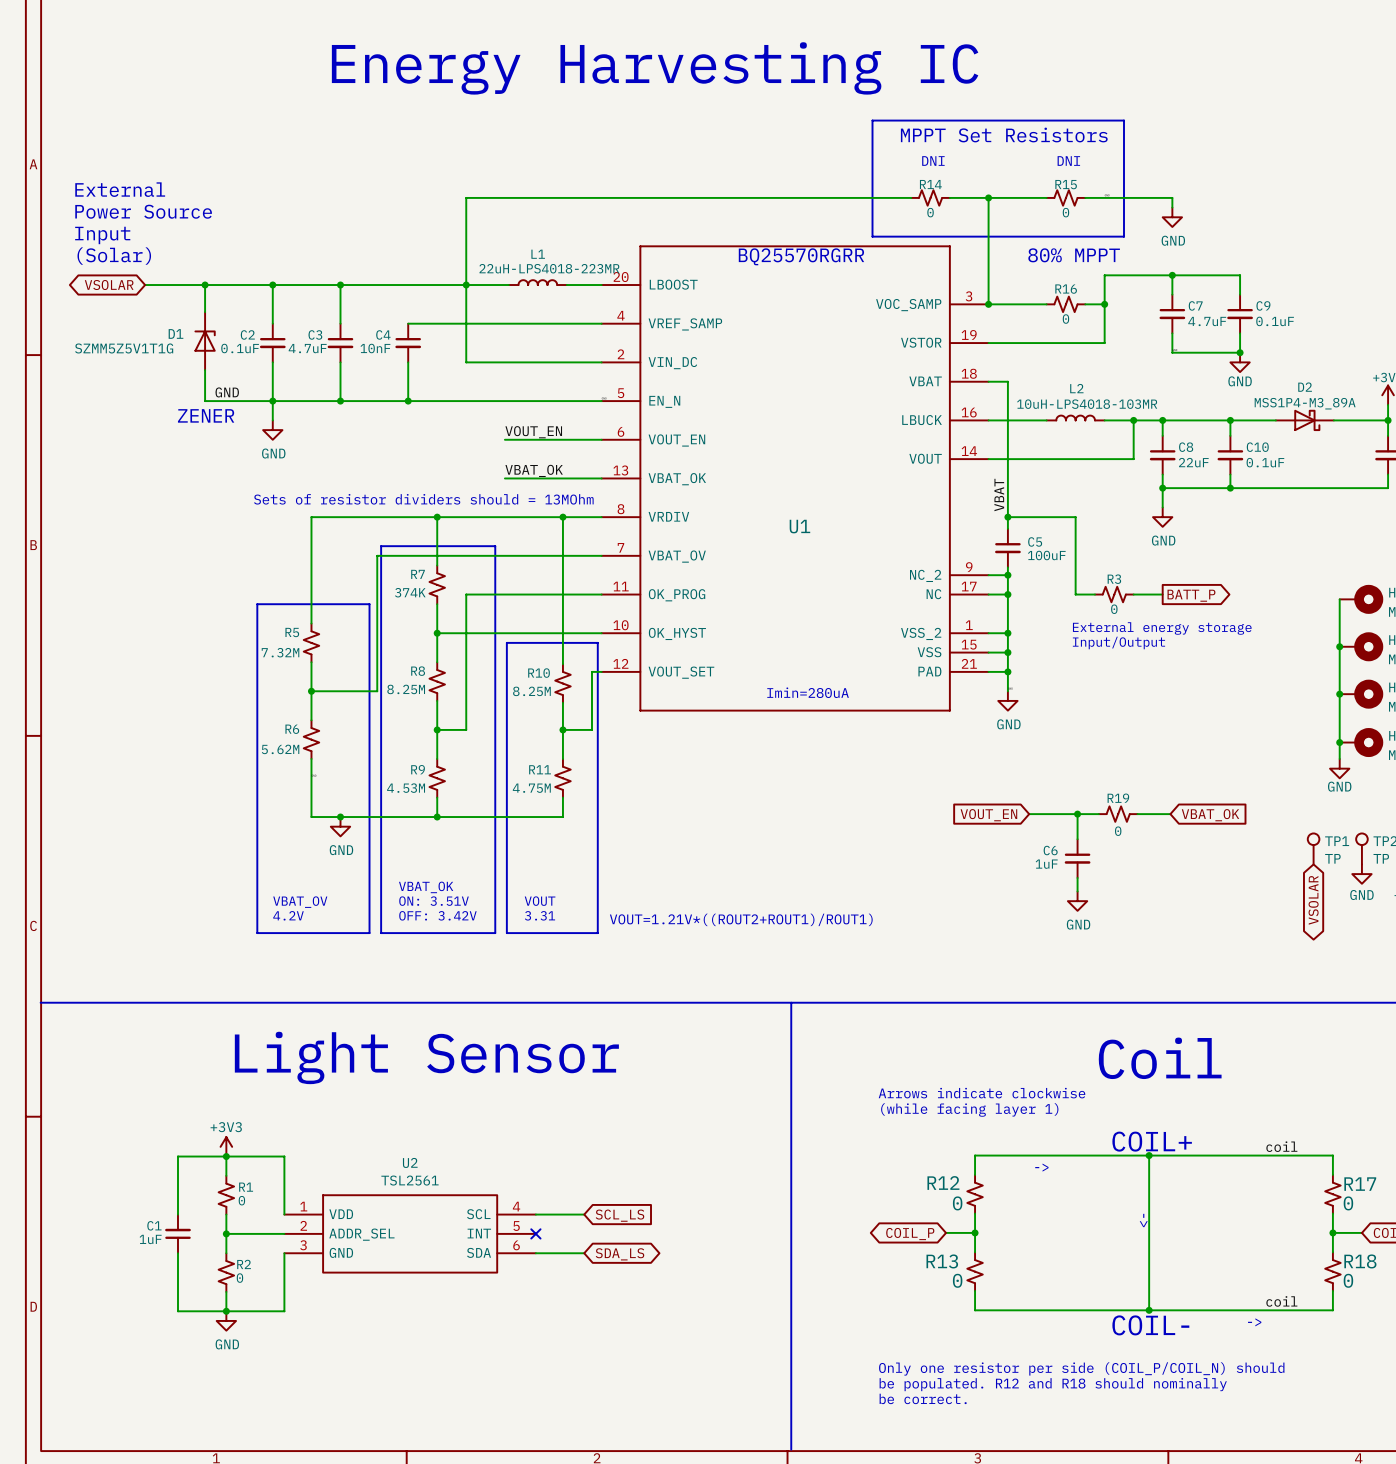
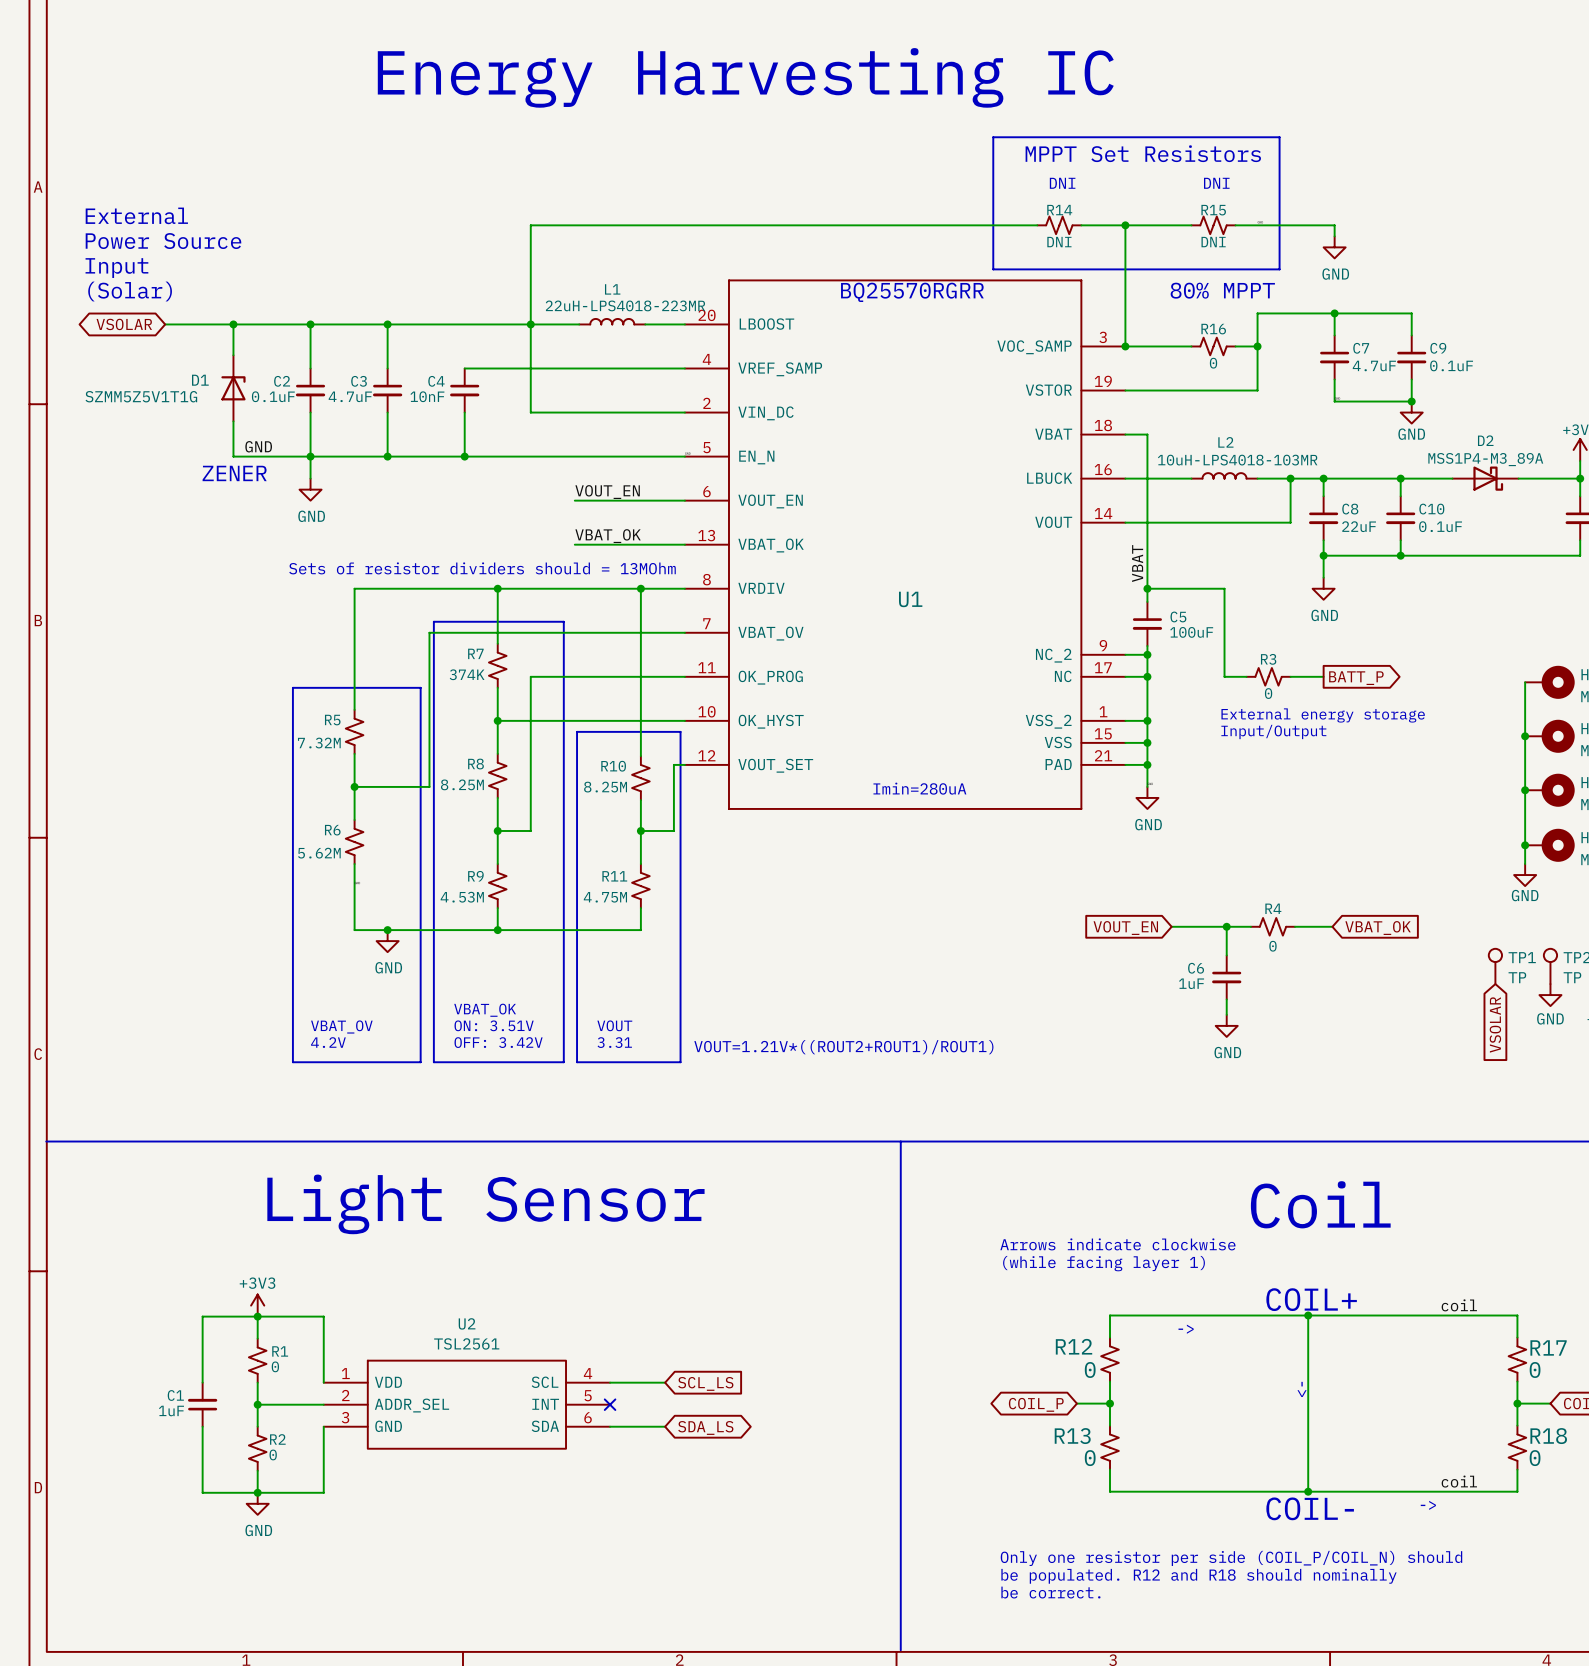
R14 value: 0 (930, 212) -> DNI (1059, 242)
R15 value: 0 (1065, 212) -> DNI (1213, 242)
R19 name: R19 (1118, 798) -> R4 (1273, 908)
global label shape: bidirectional (1313, 900) -> input (1495, 1024)

